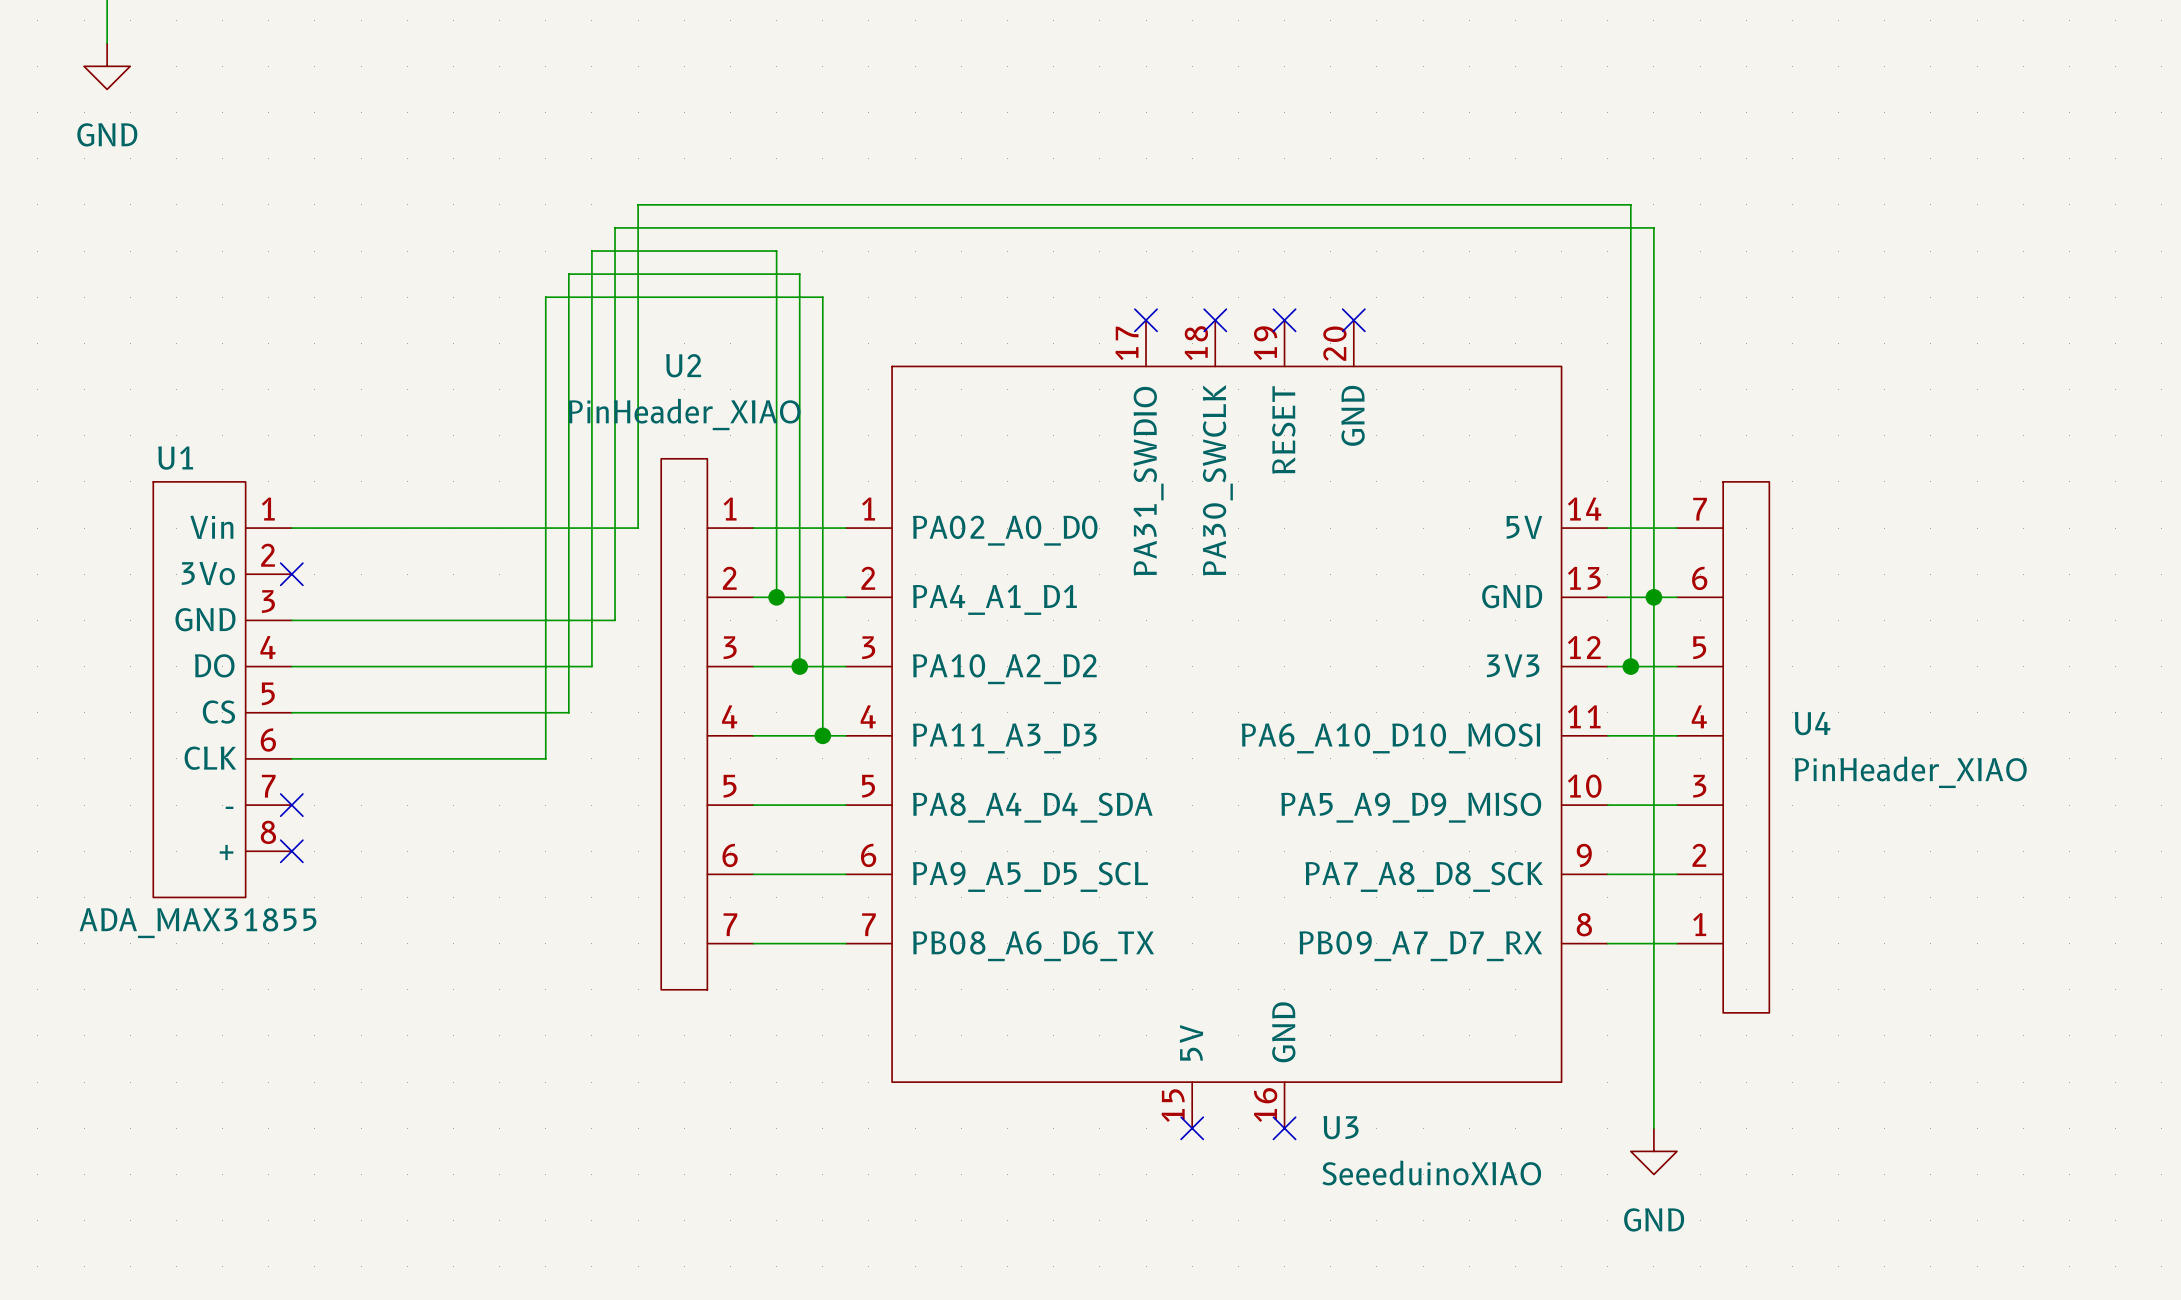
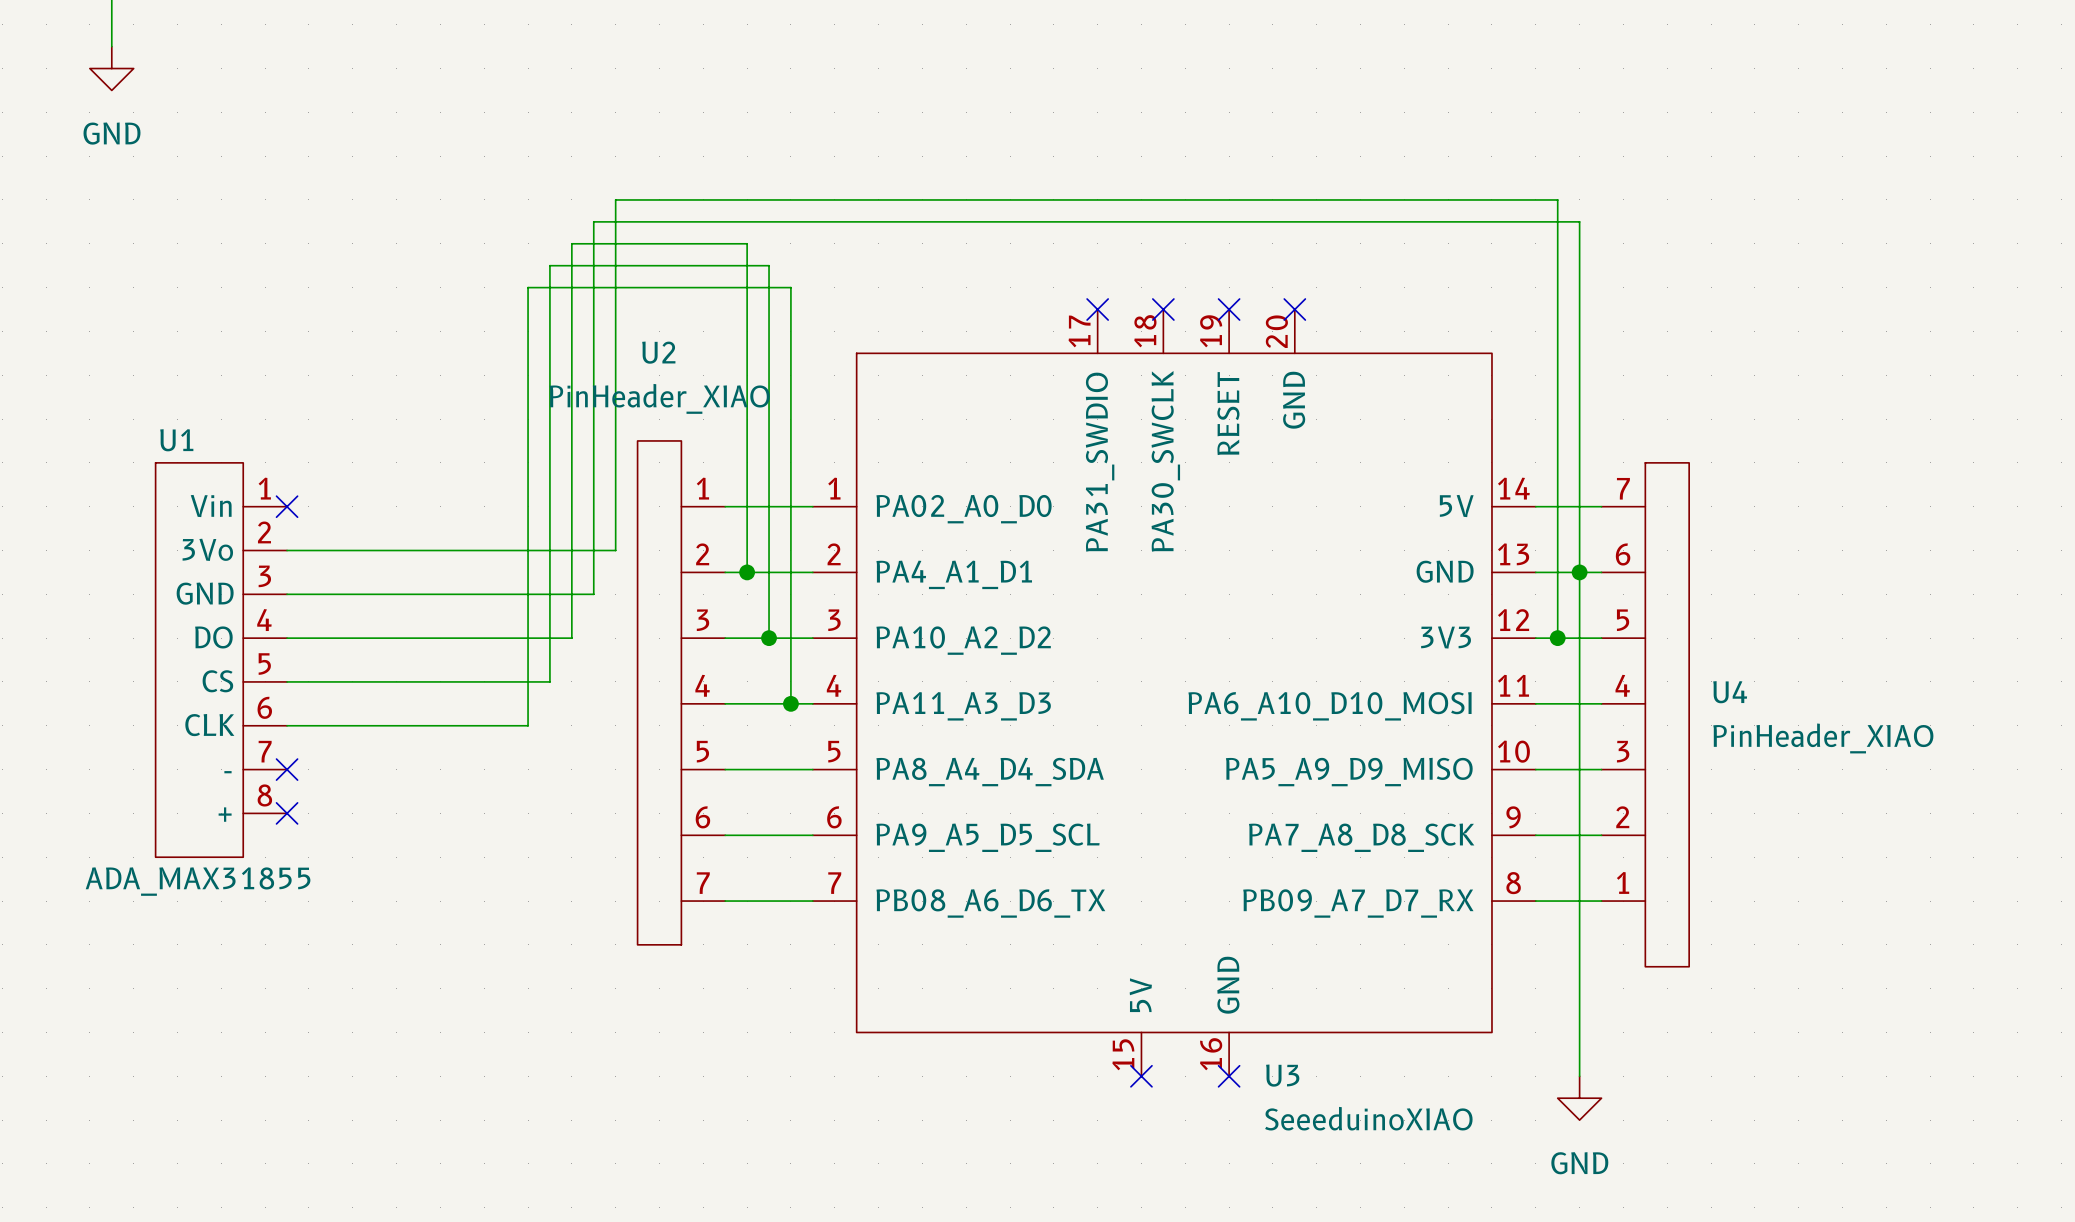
wire: (291, 528) (638, 528) -> (287, 550) (615, 550) (615, 506)
no-connect mark position: (291, 574) -> (287, 506)

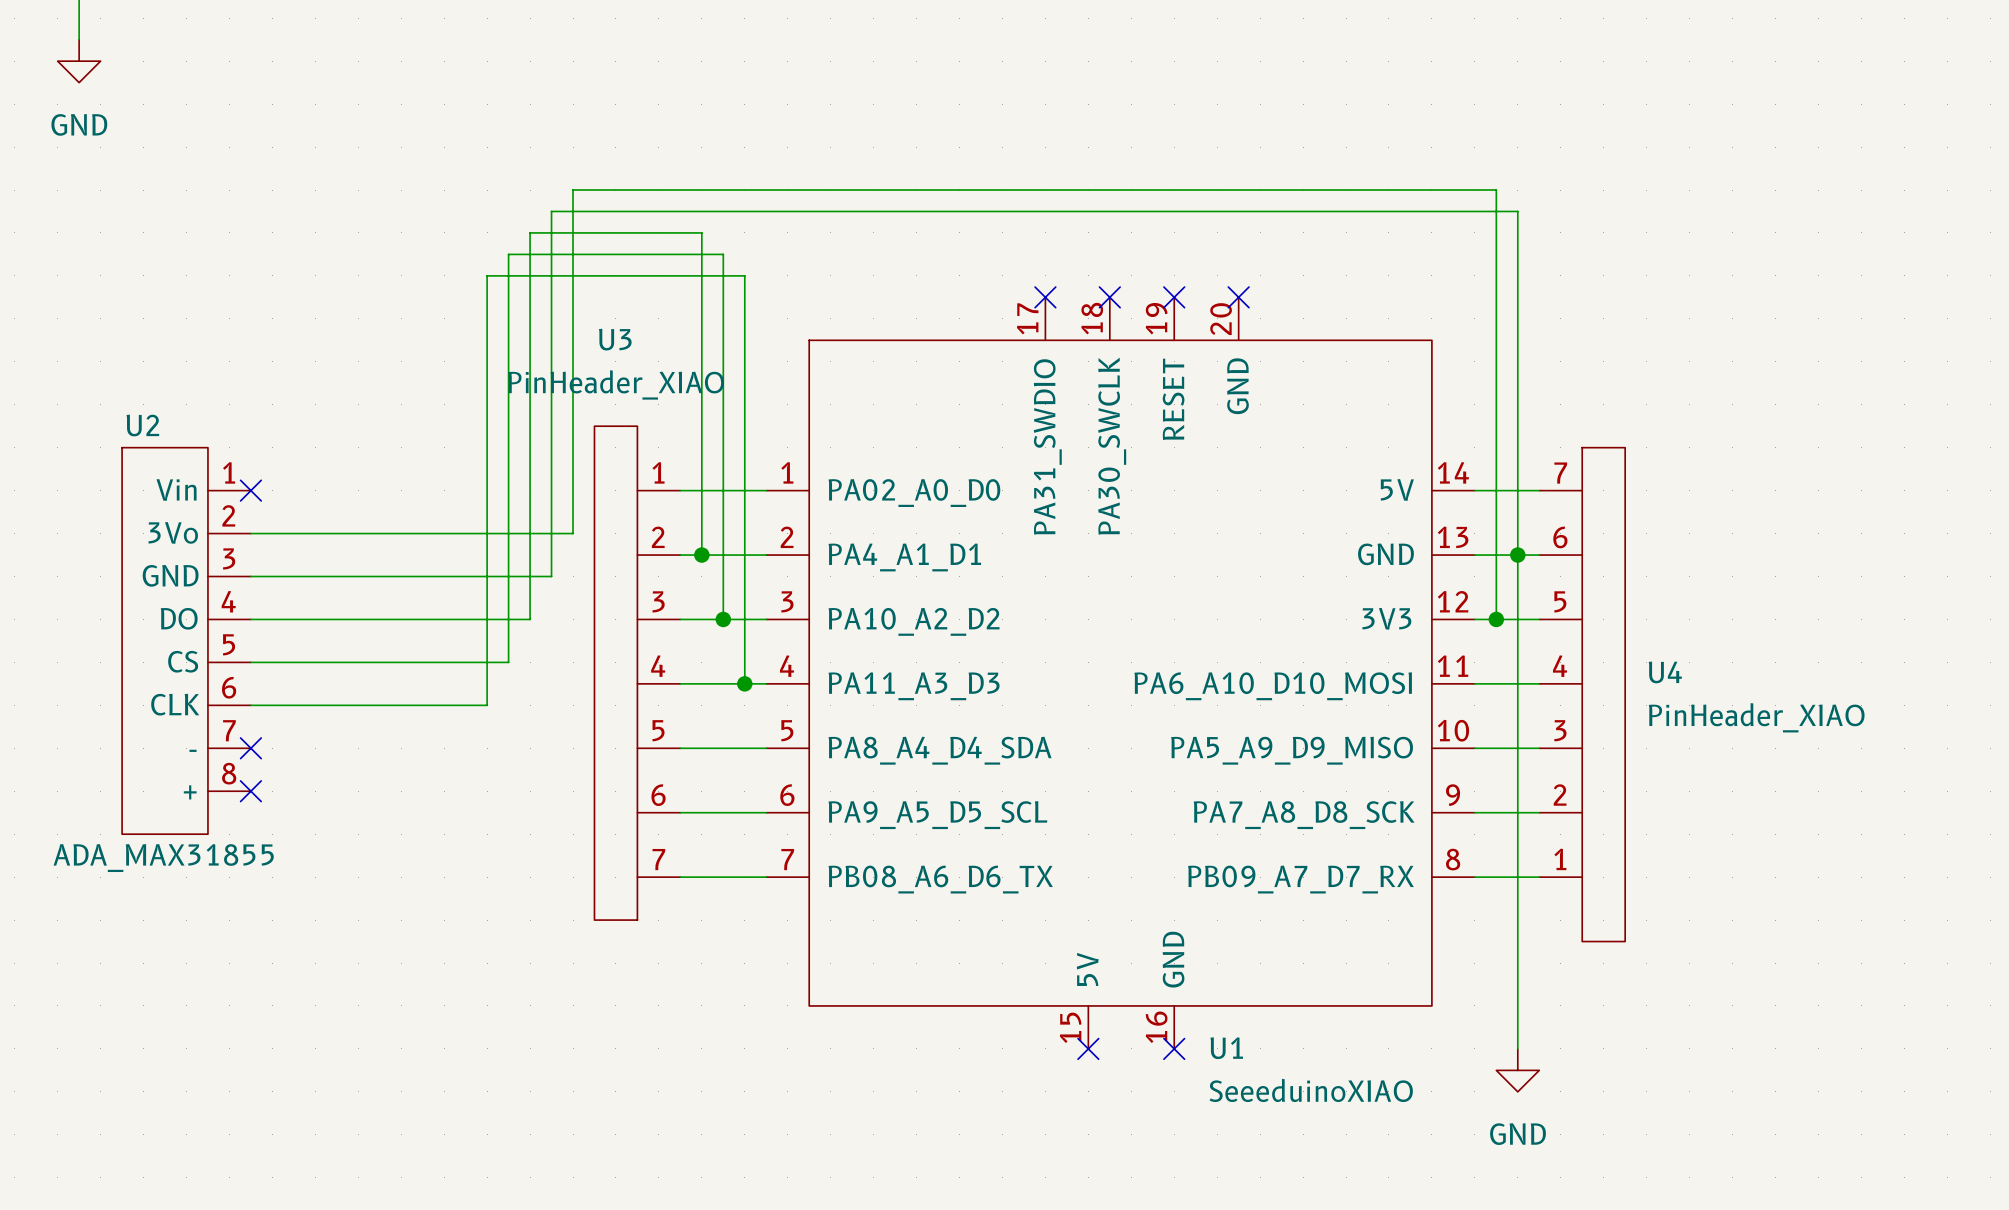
U2 name: U2 (658, 352) -> U3 (615, 339)
U1 name: U1 (176, 440) -> U2 (142, 425)
U3 name: U3 (1282, 1075) -> U1 (1226, 1048)

